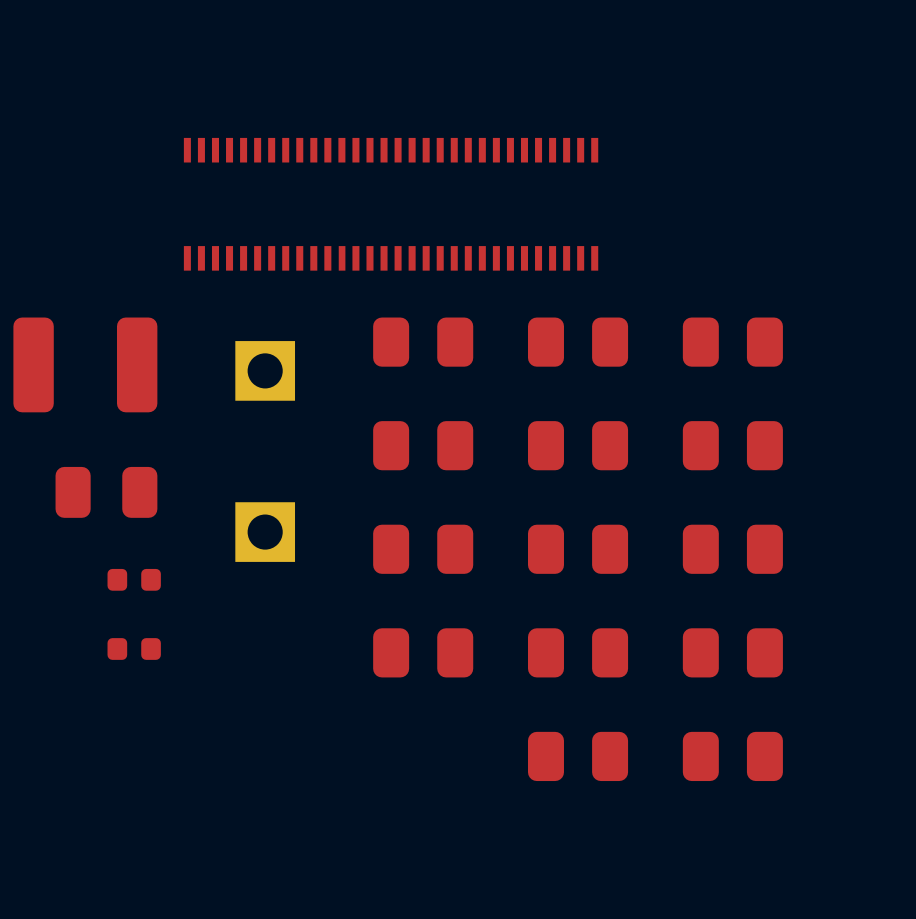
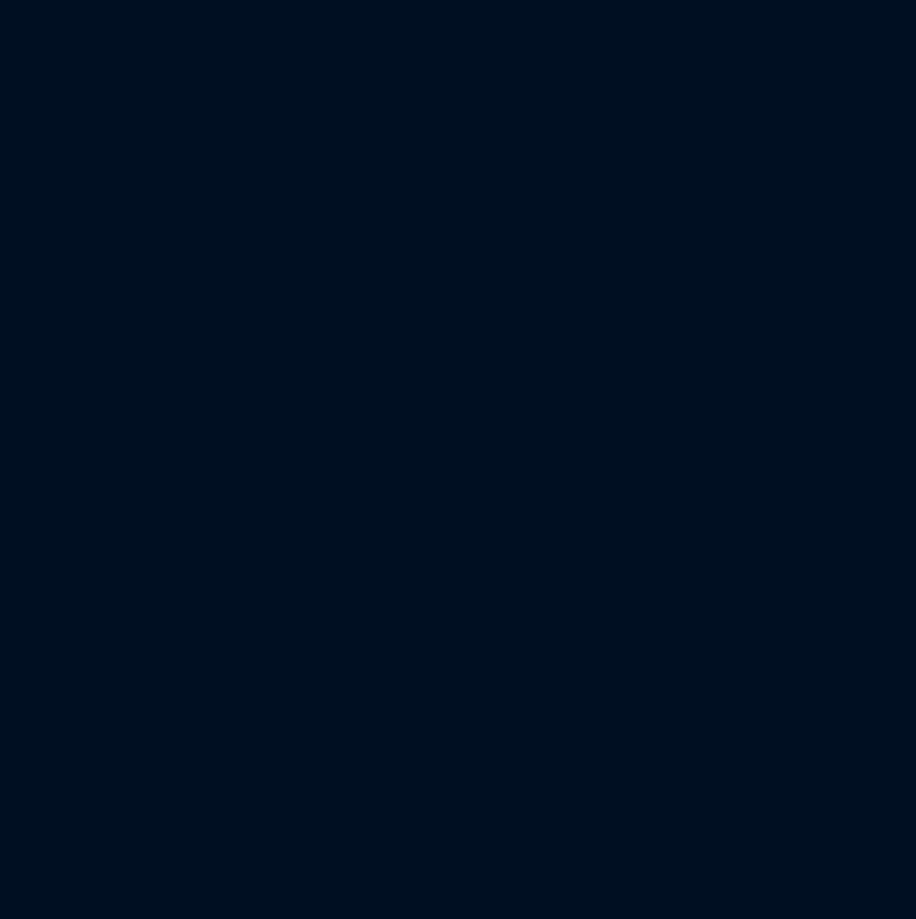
part: (391, 204) -> none
part: (423, 342) -> none
part: (578, 342) -> none
part: (732, 342) -> none
part: (85, 364) -> none
part: (265, 370) -> none
part: (423, 445) -> none
part: (578, 445) -> none
part: (732, 445) -> none
part: (106, 492) -> none
part: (265, 532) -> none
part: (423, 549) -> none
part: (578, 549) -> none
part: (732, 549) -> none
part: (134, 579) -> none
part: (134, 649) -> none
part: (423, 652) -> none
part: (578, 652) -> none
part: (732, 652) -> none
part: (578, 756) -> none
part: (732, 756) -> none

